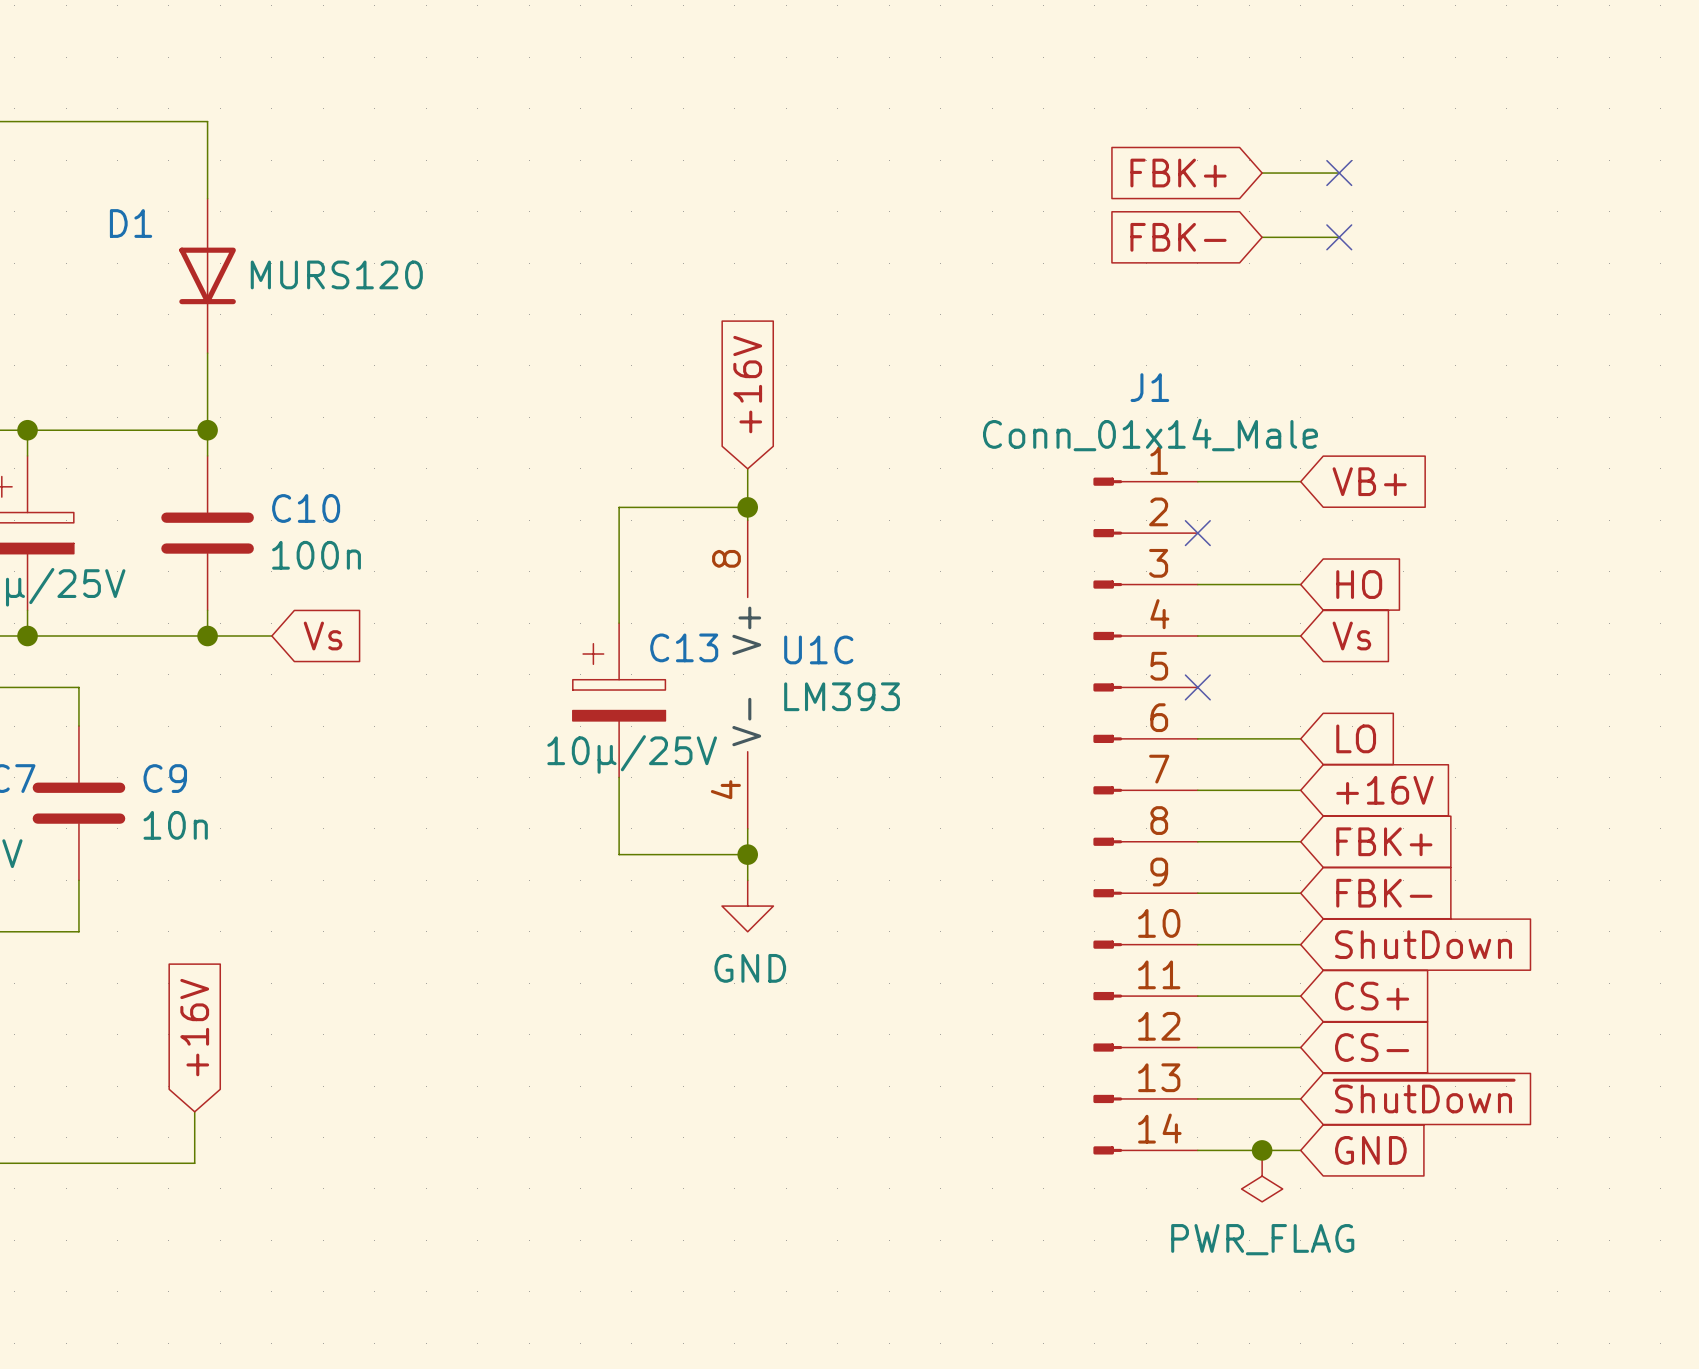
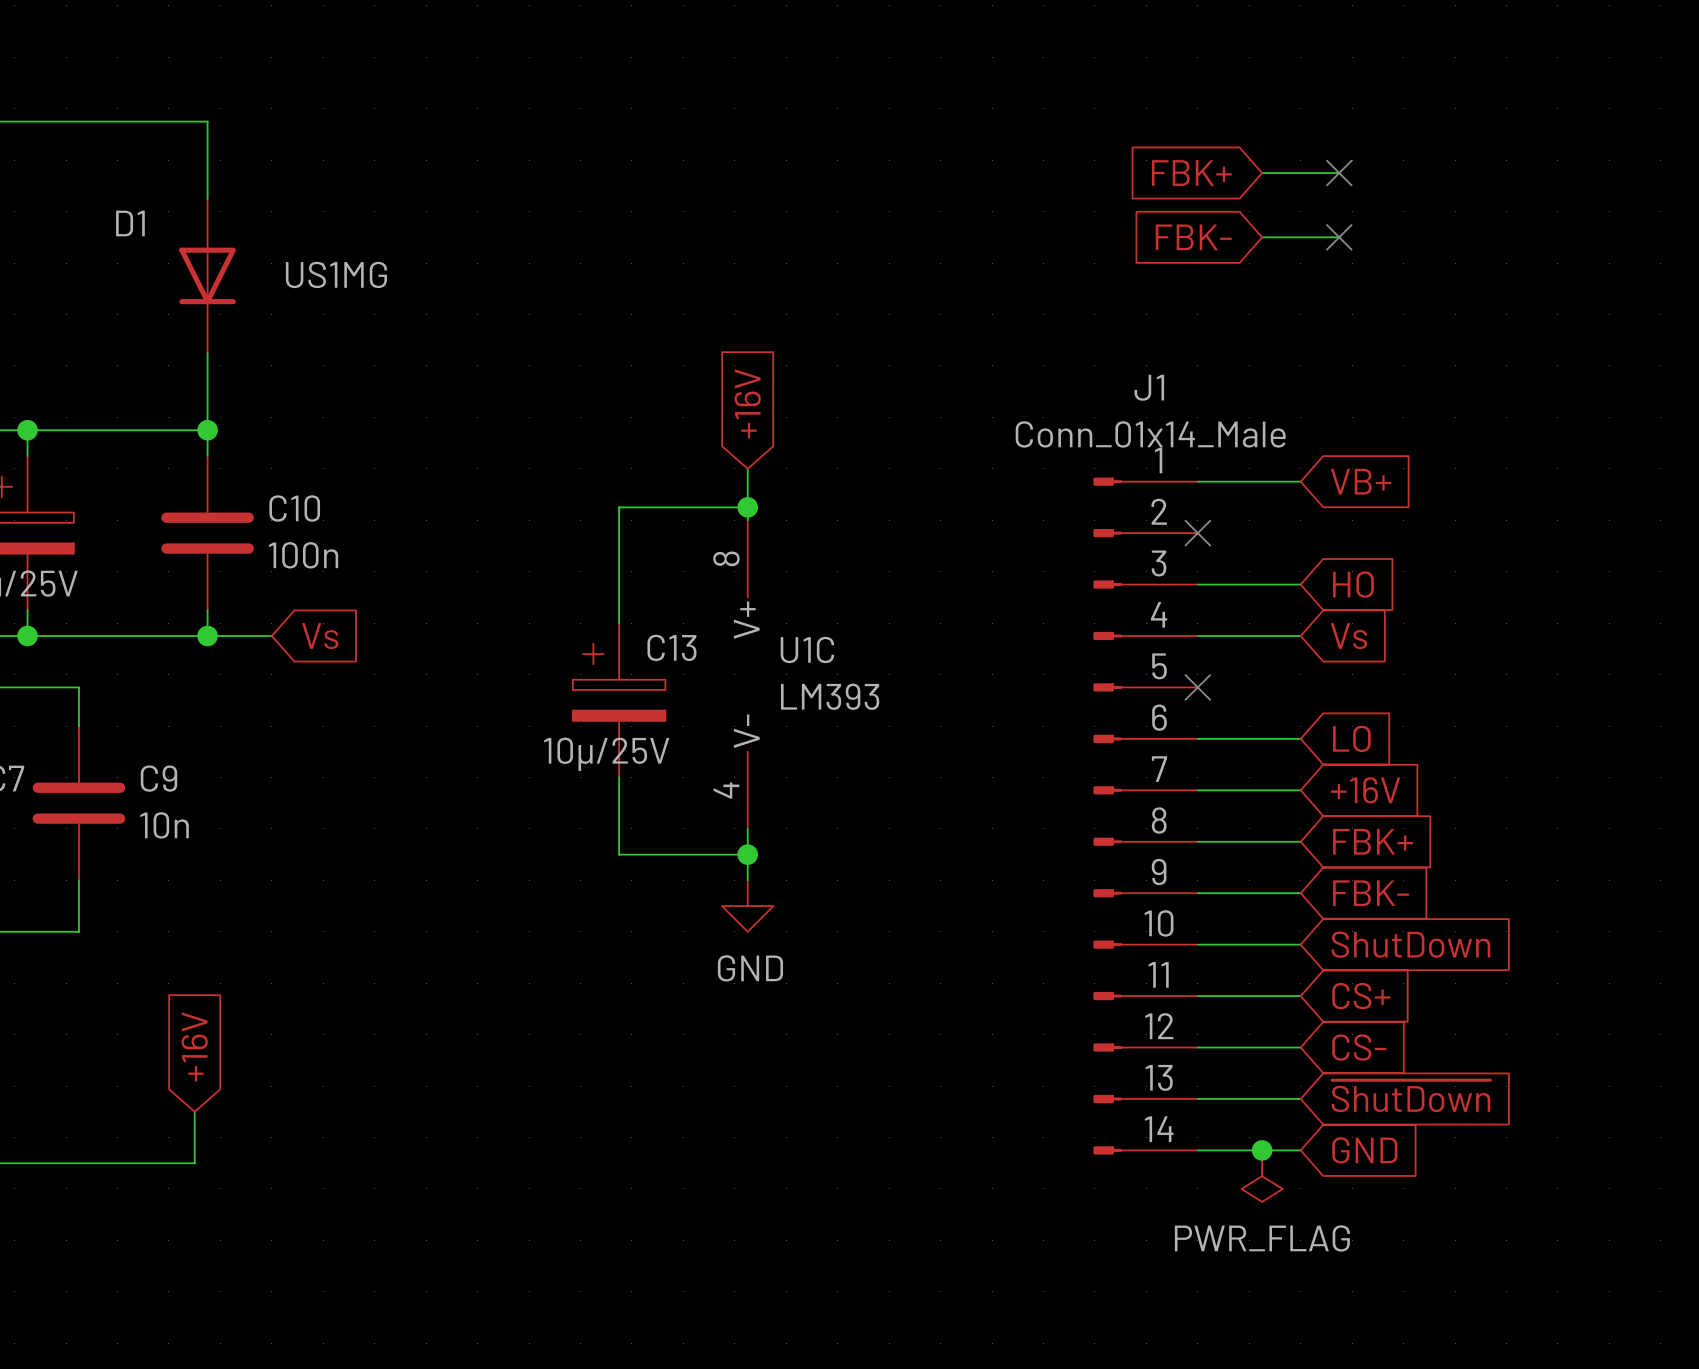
D1 value: MURS120 (336, 274) -> US1MG (336, 274)

